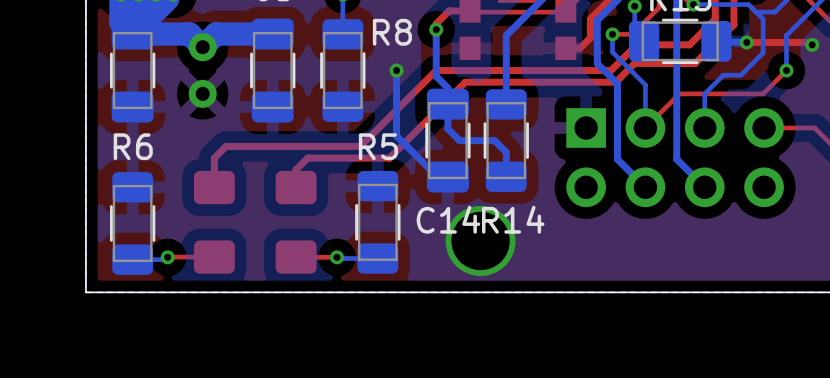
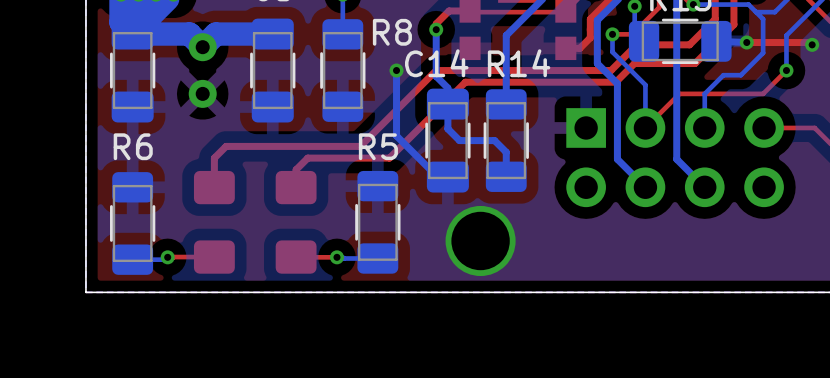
C14 name position: C14 (448, 219) -> C14 (436, 63)
R14 name position: R14 (513, 219) -> R14 (519, 63)

